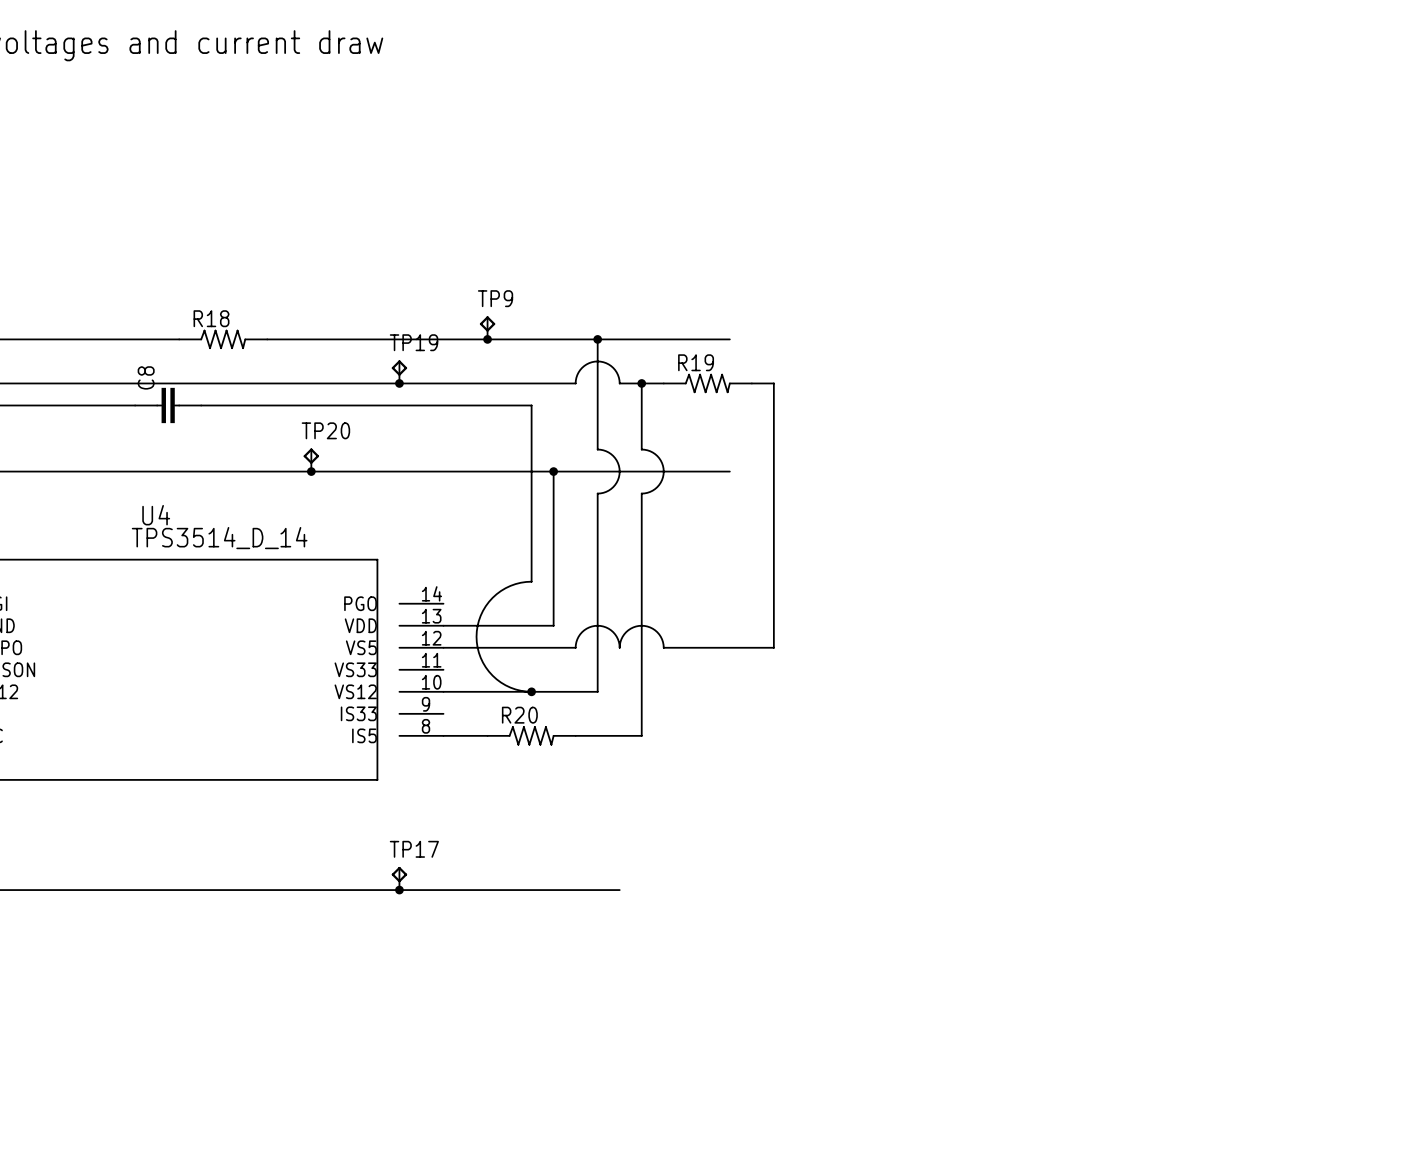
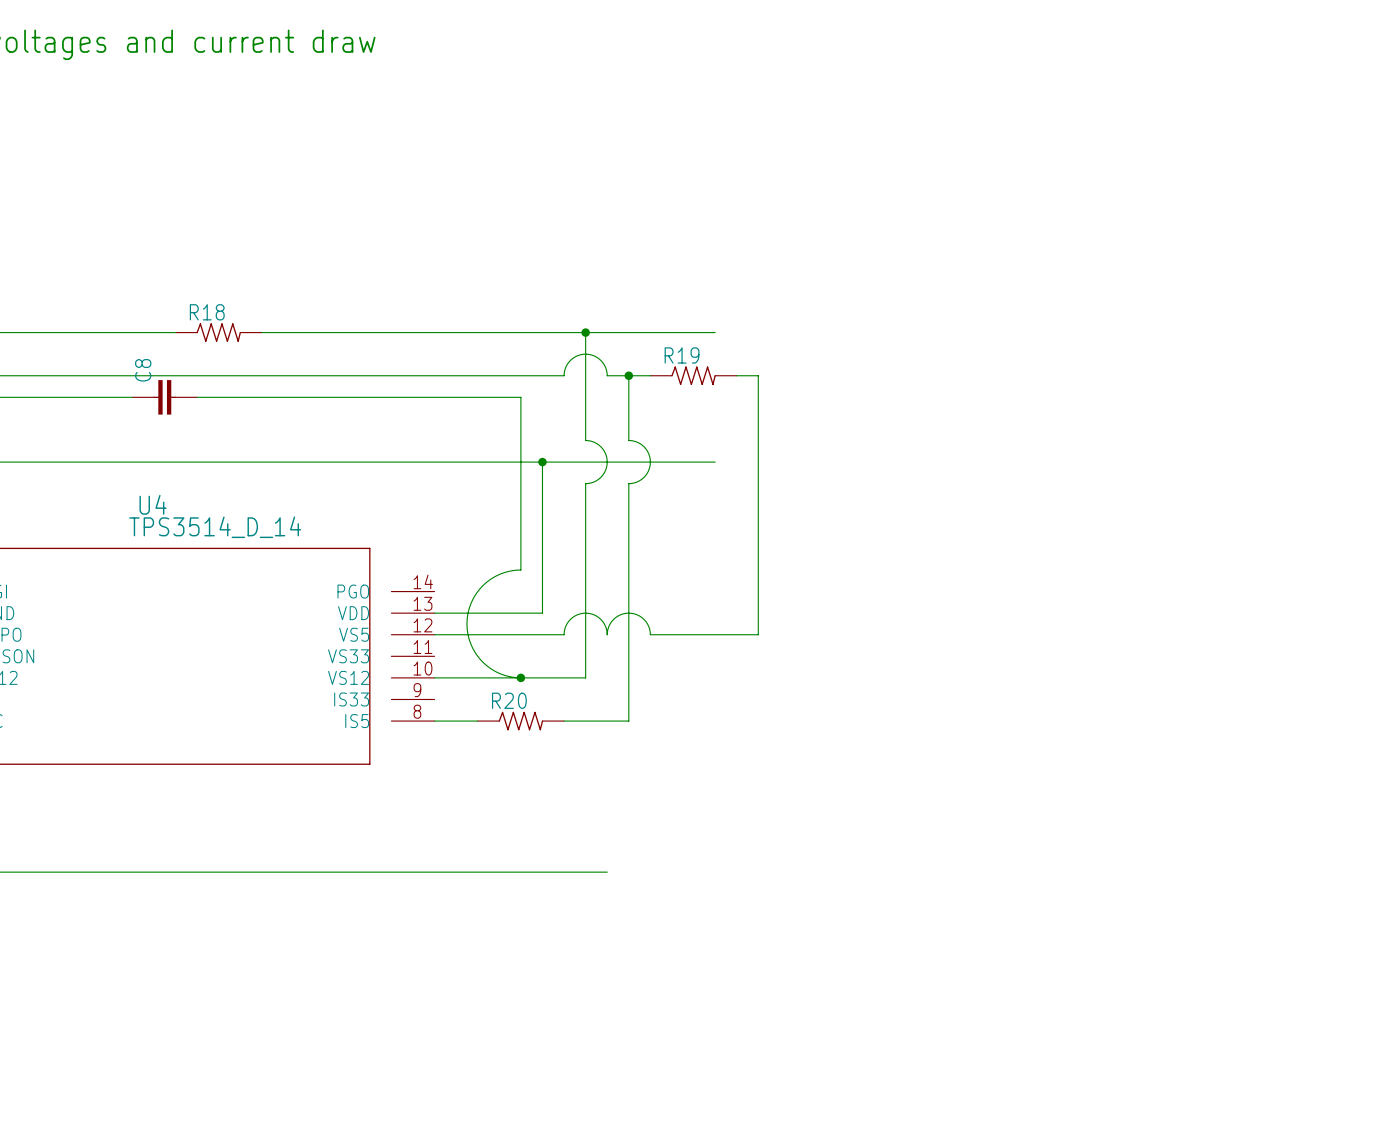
TP9: (487, 327) -> none
junction: (487, 339) -> none
TP19: (399, 371) -> none
junction: (399, 383) -> none
TP20: (311, 460) -> none
junction: (311, 471) -> none
TP17: (399, 878) -> none
junction: (399, 890) -> none

